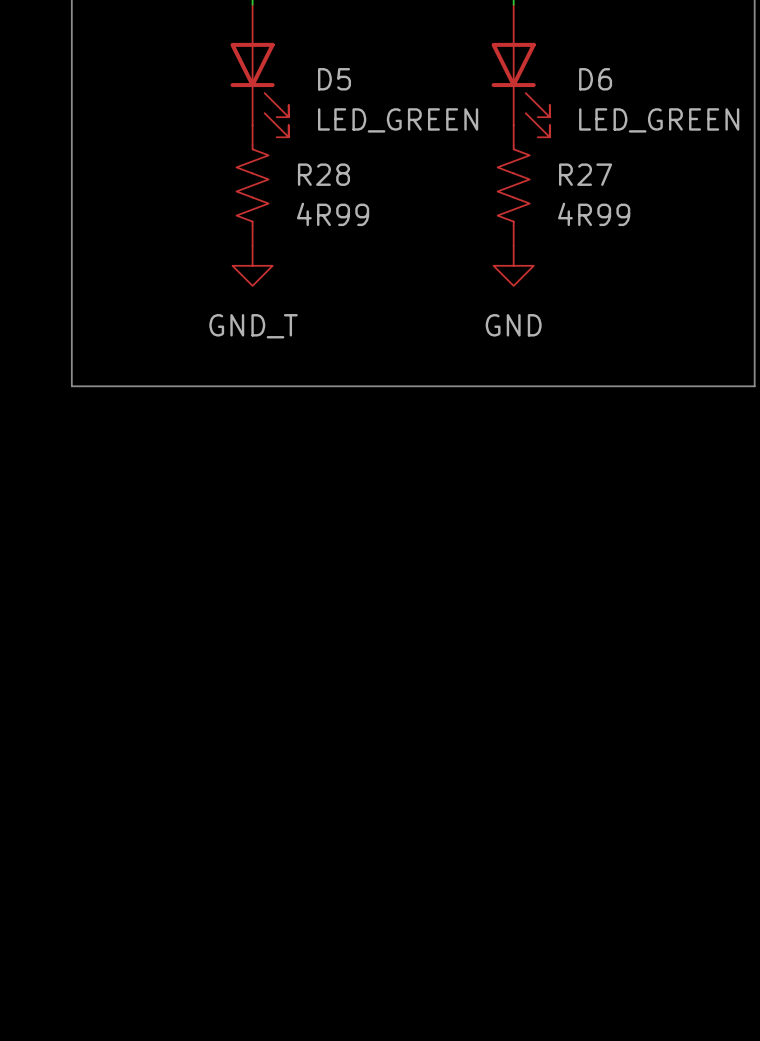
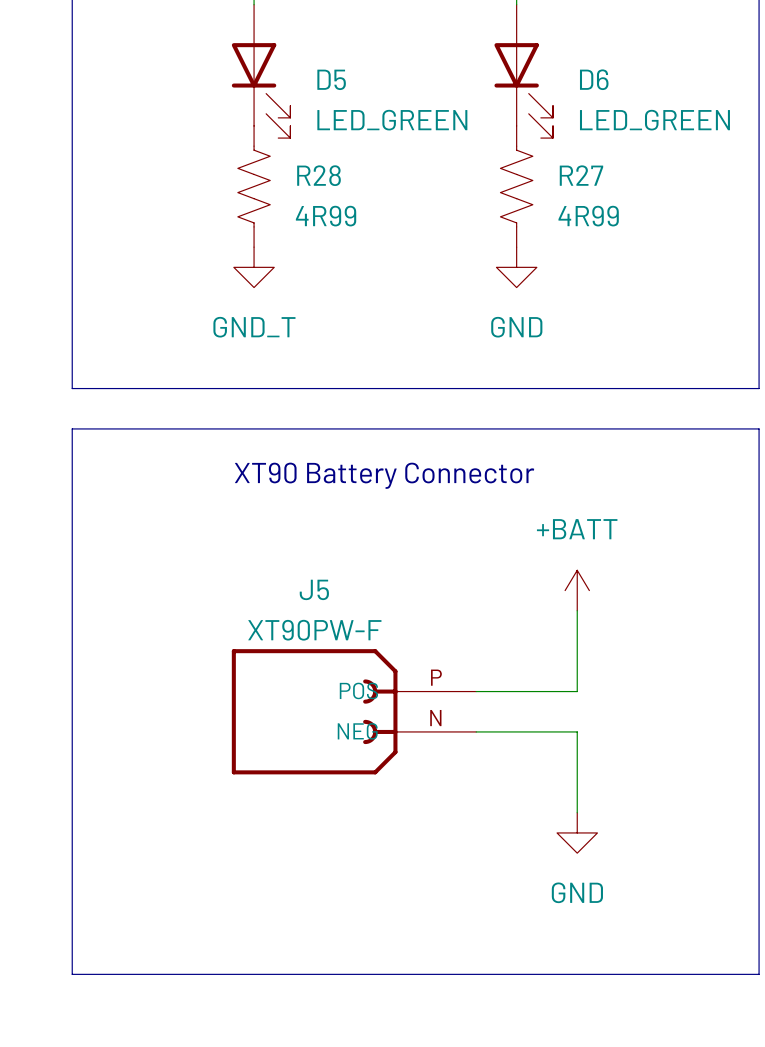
line: none -> (72, 428) (759, 428) (759, 974) (72, 974) (72, 428)
text: none -> XT90 Battery Connector (384, 475)
power symbol: none -> +BATT (577, 590)
wire: none -> (577, 610) (577, 691) (476, 691)
J5: none -> XT90PW-F (354, 711)
wire: none -> (476, 731) (577, 731) (577, 812)
power symbol: none -> GND (577, 832)

